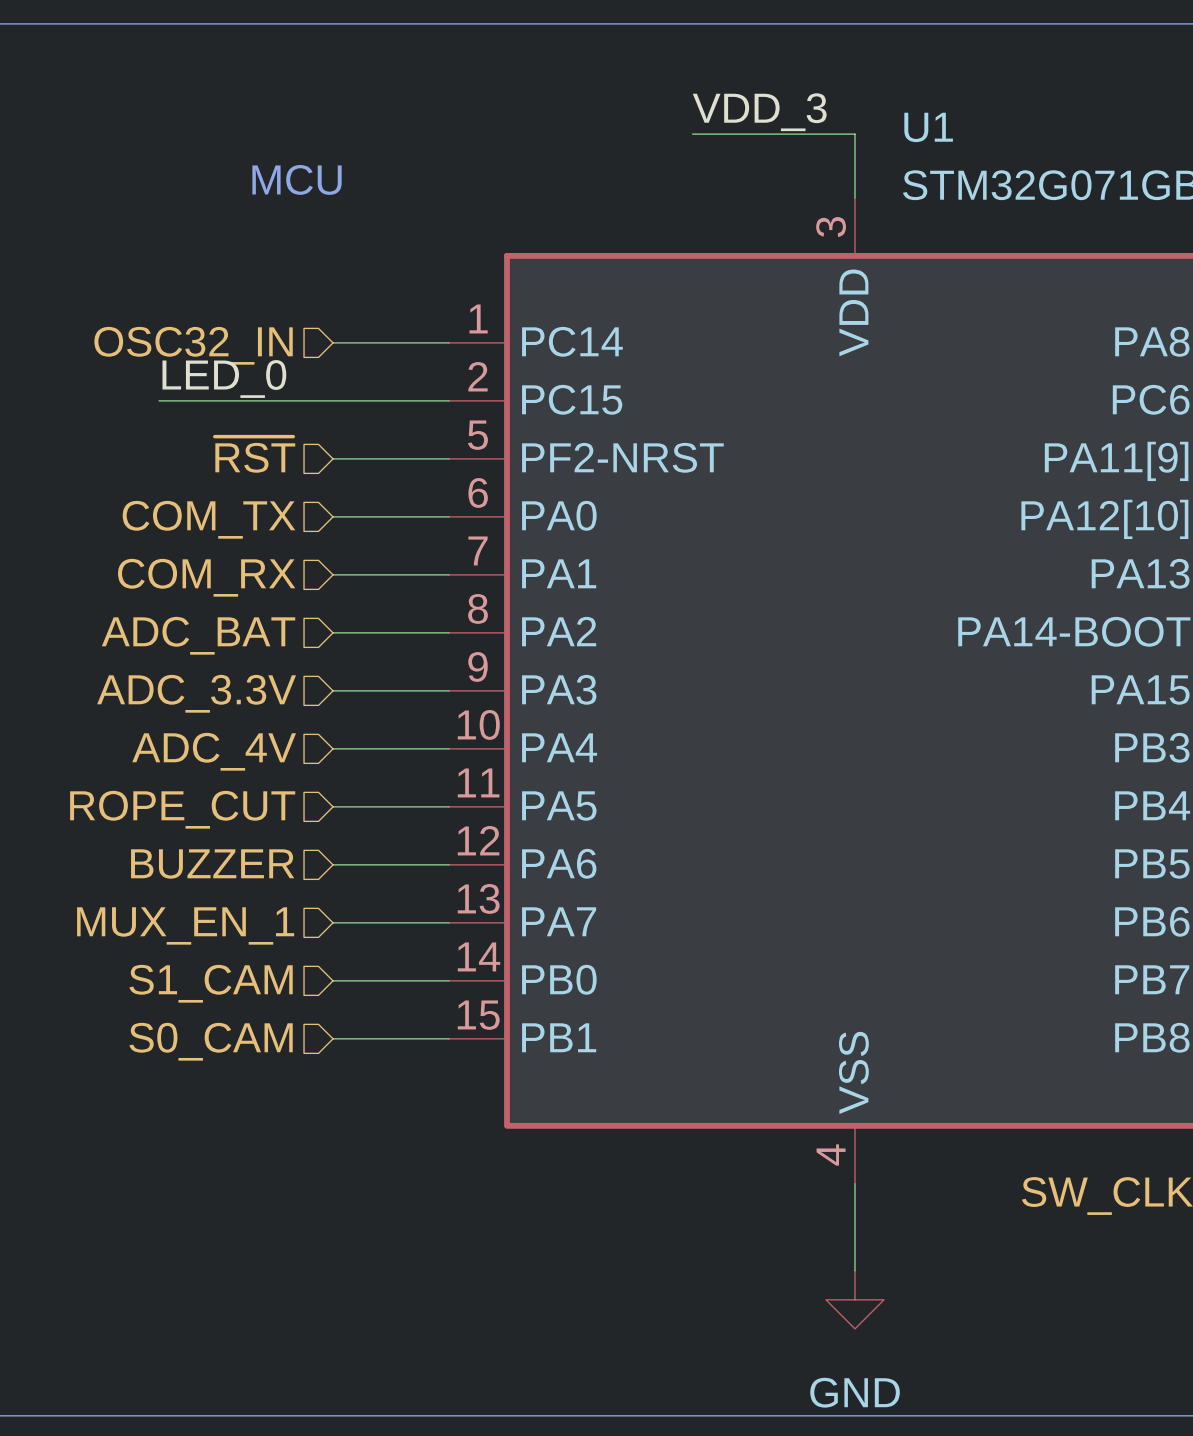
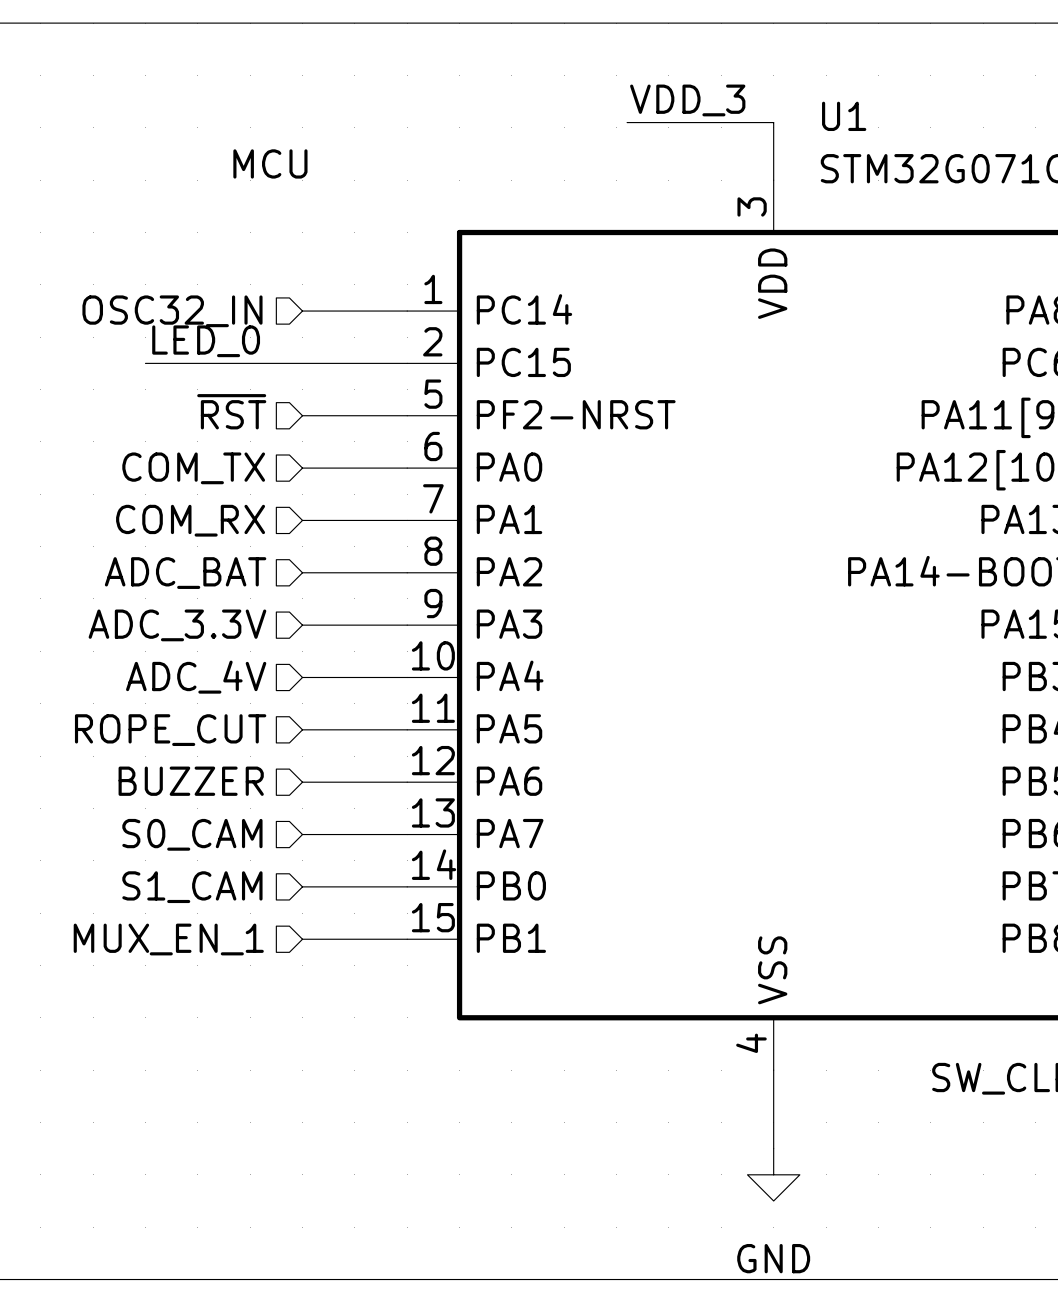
hierarchical label: MUX_EN_1 (185, 925) -> S0_CAM (192, 834)
hierarchical label: S0_CAM (211, 1041) -> MUX_EN_1 (168, 939)

